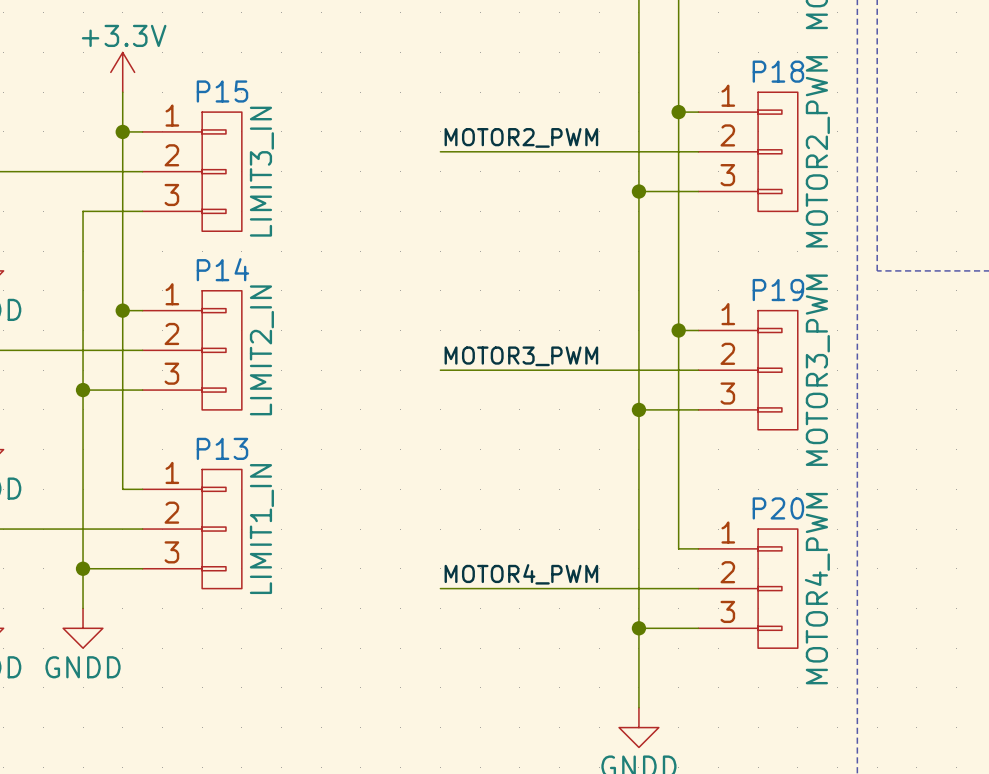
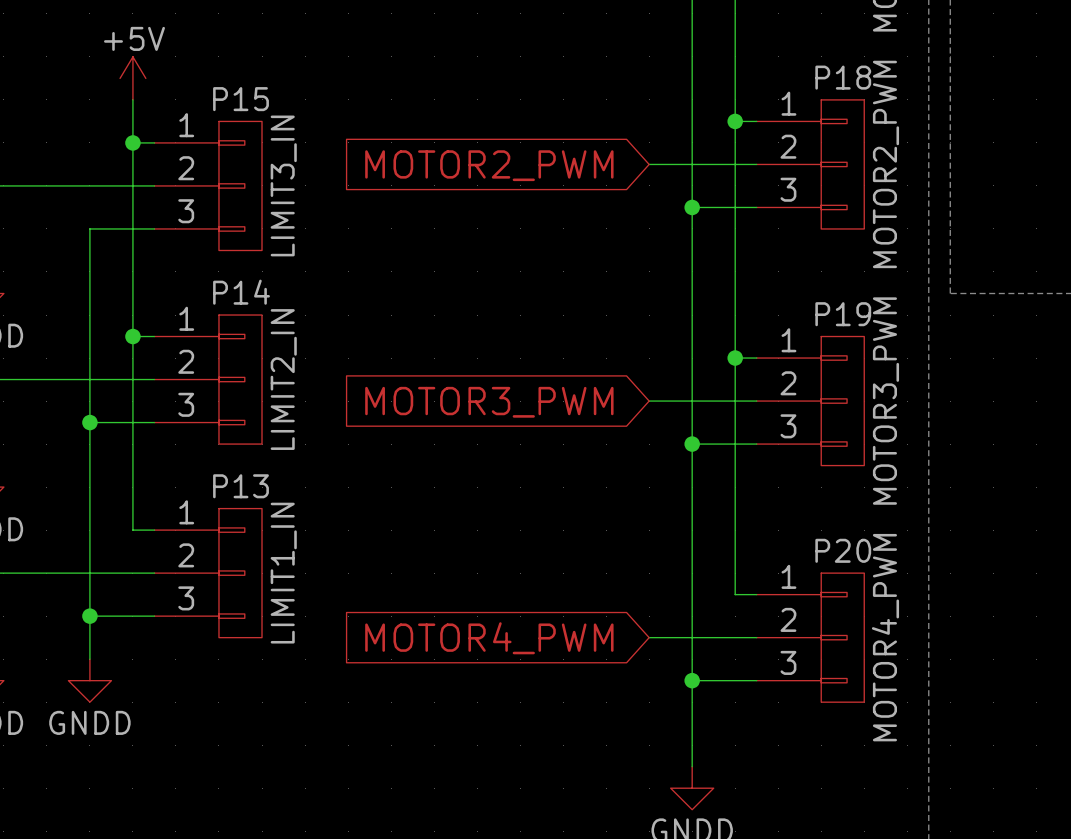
power symbol: +3.3V (122, 72) -> +5V (132, 78)
label: MOTOR2_PWM (521, 137) -> none
wire: (440, 151) (599, 151) -> none
global label: none -> MOTOR2_PWM (489, 165)
label: MOTOR3_PWM (521, 356) -> none
wire: (440, 370) (599, 370) -> none
global label: none -> MOTOR3_PWM (489, 402)
label: MOTOR4_PWM (521, 574) -> none
wire: (440, 588) (599, 588) -> none
global label: none -> MOTOR4_PWM (489, 638)

